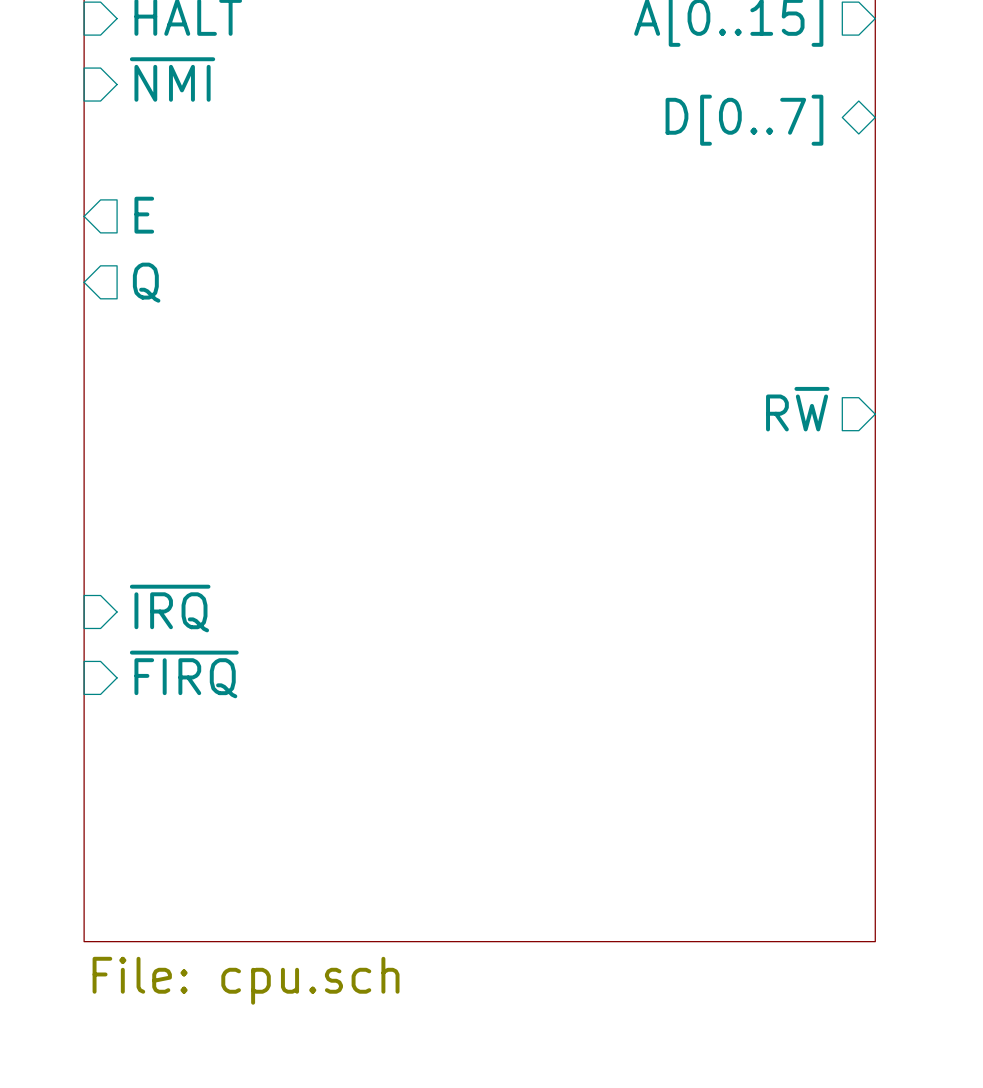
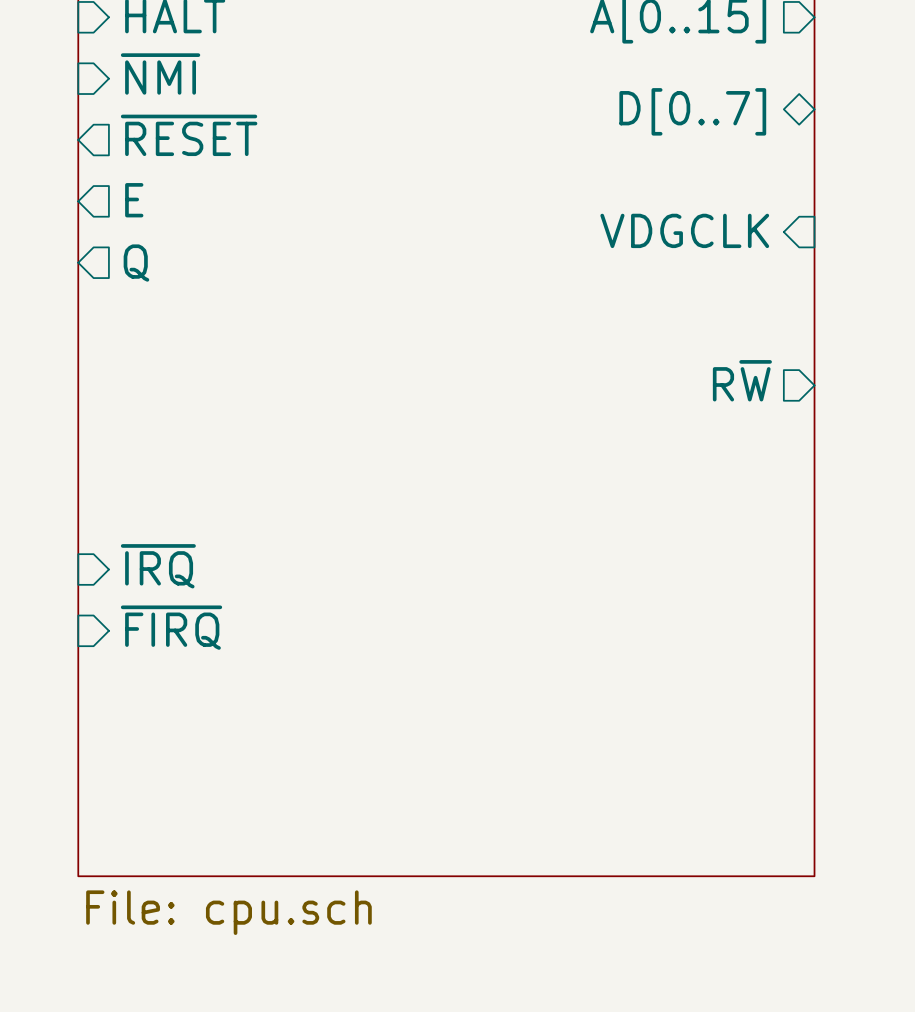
sheet pin: none -> ~{RESET} (189, 135)
sheet pin: none -> VDGCLK (684, 230)

